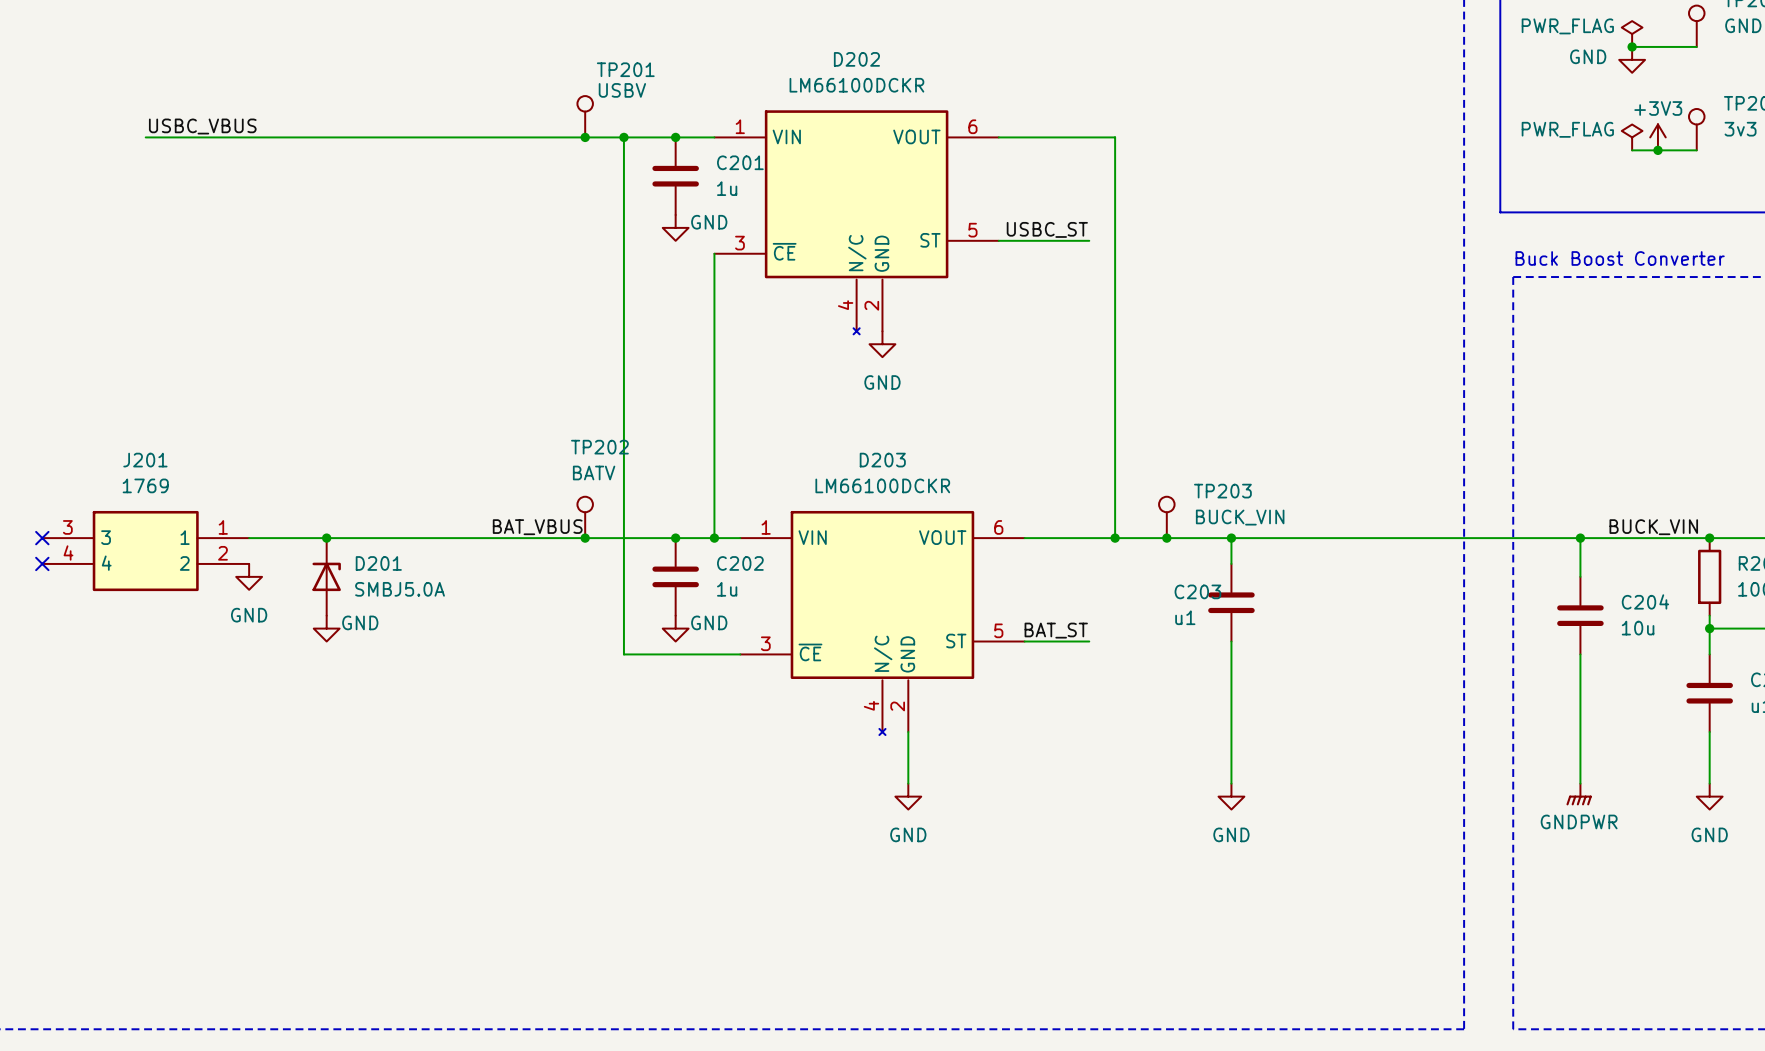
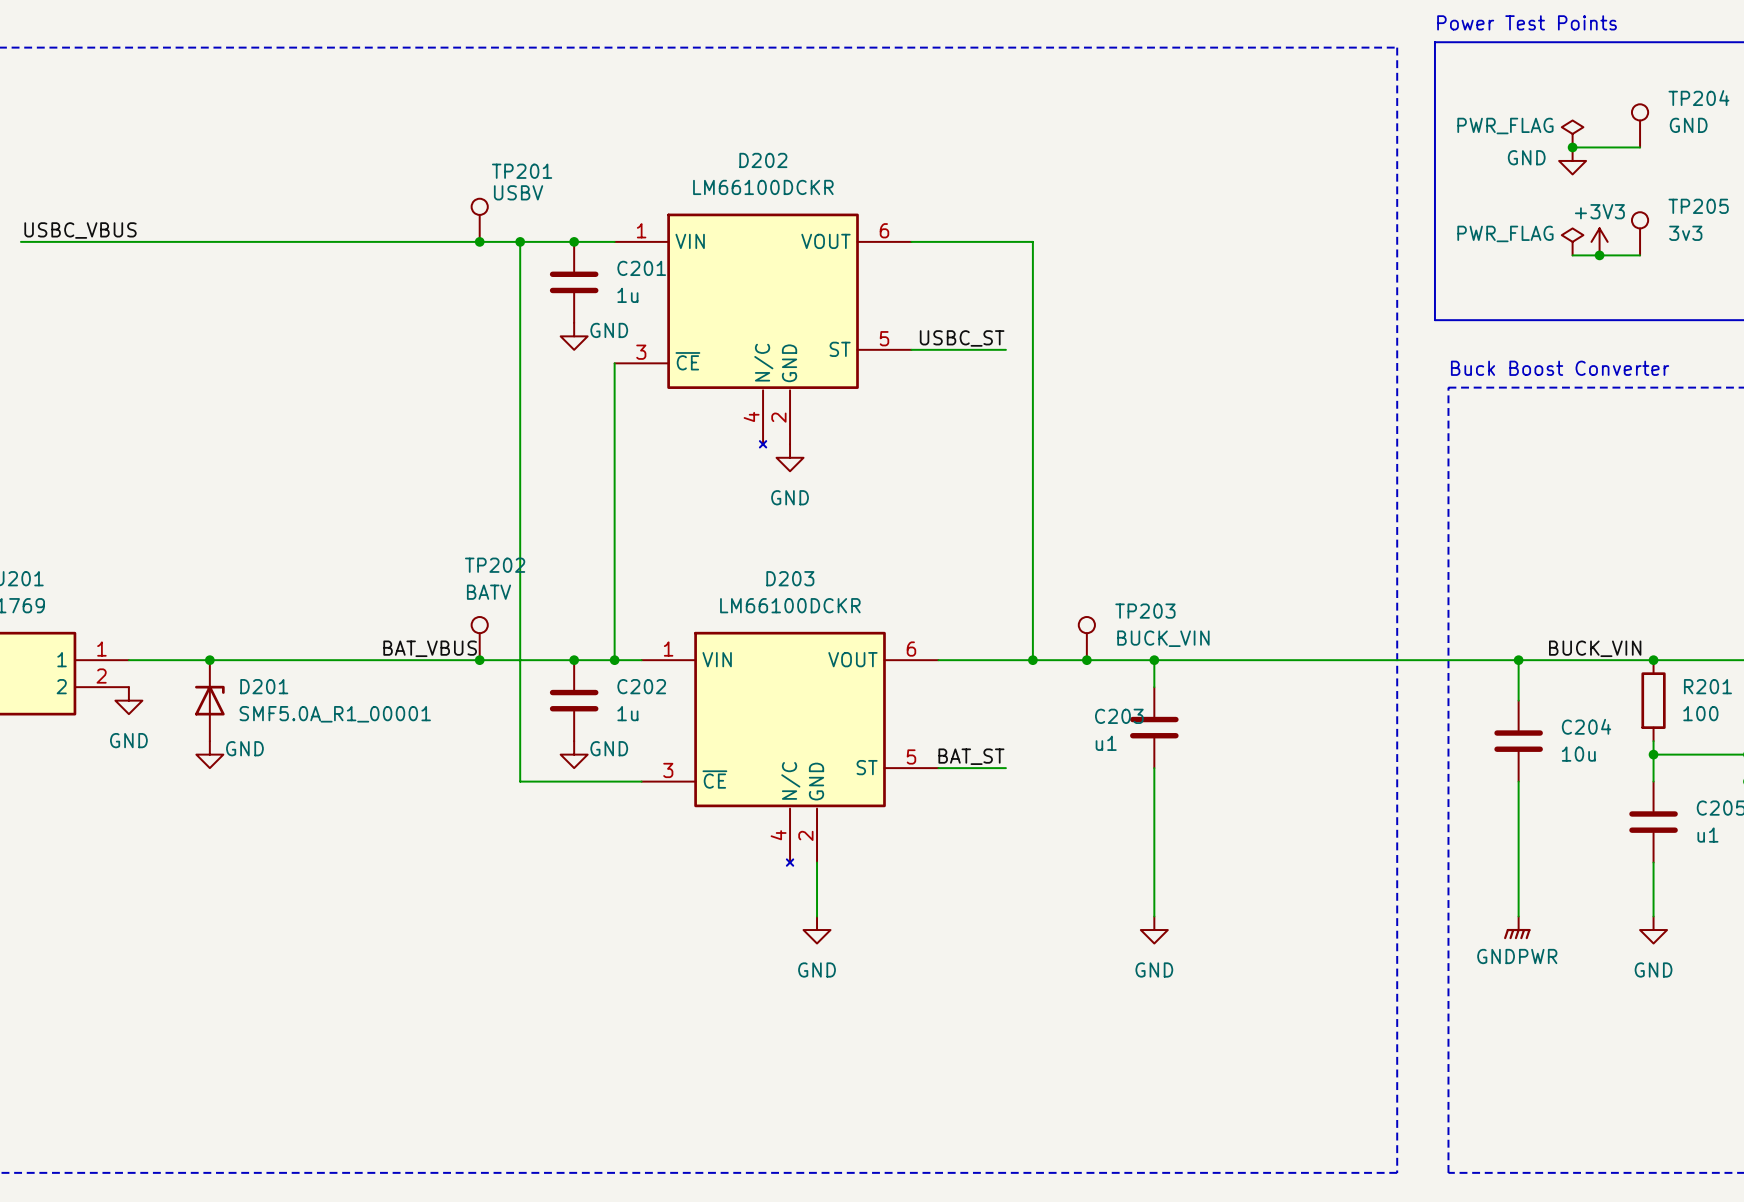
D201 value: SMBJ5.0A (400, 589) -> SMF5.0A_R1_00001 (335, 714)

